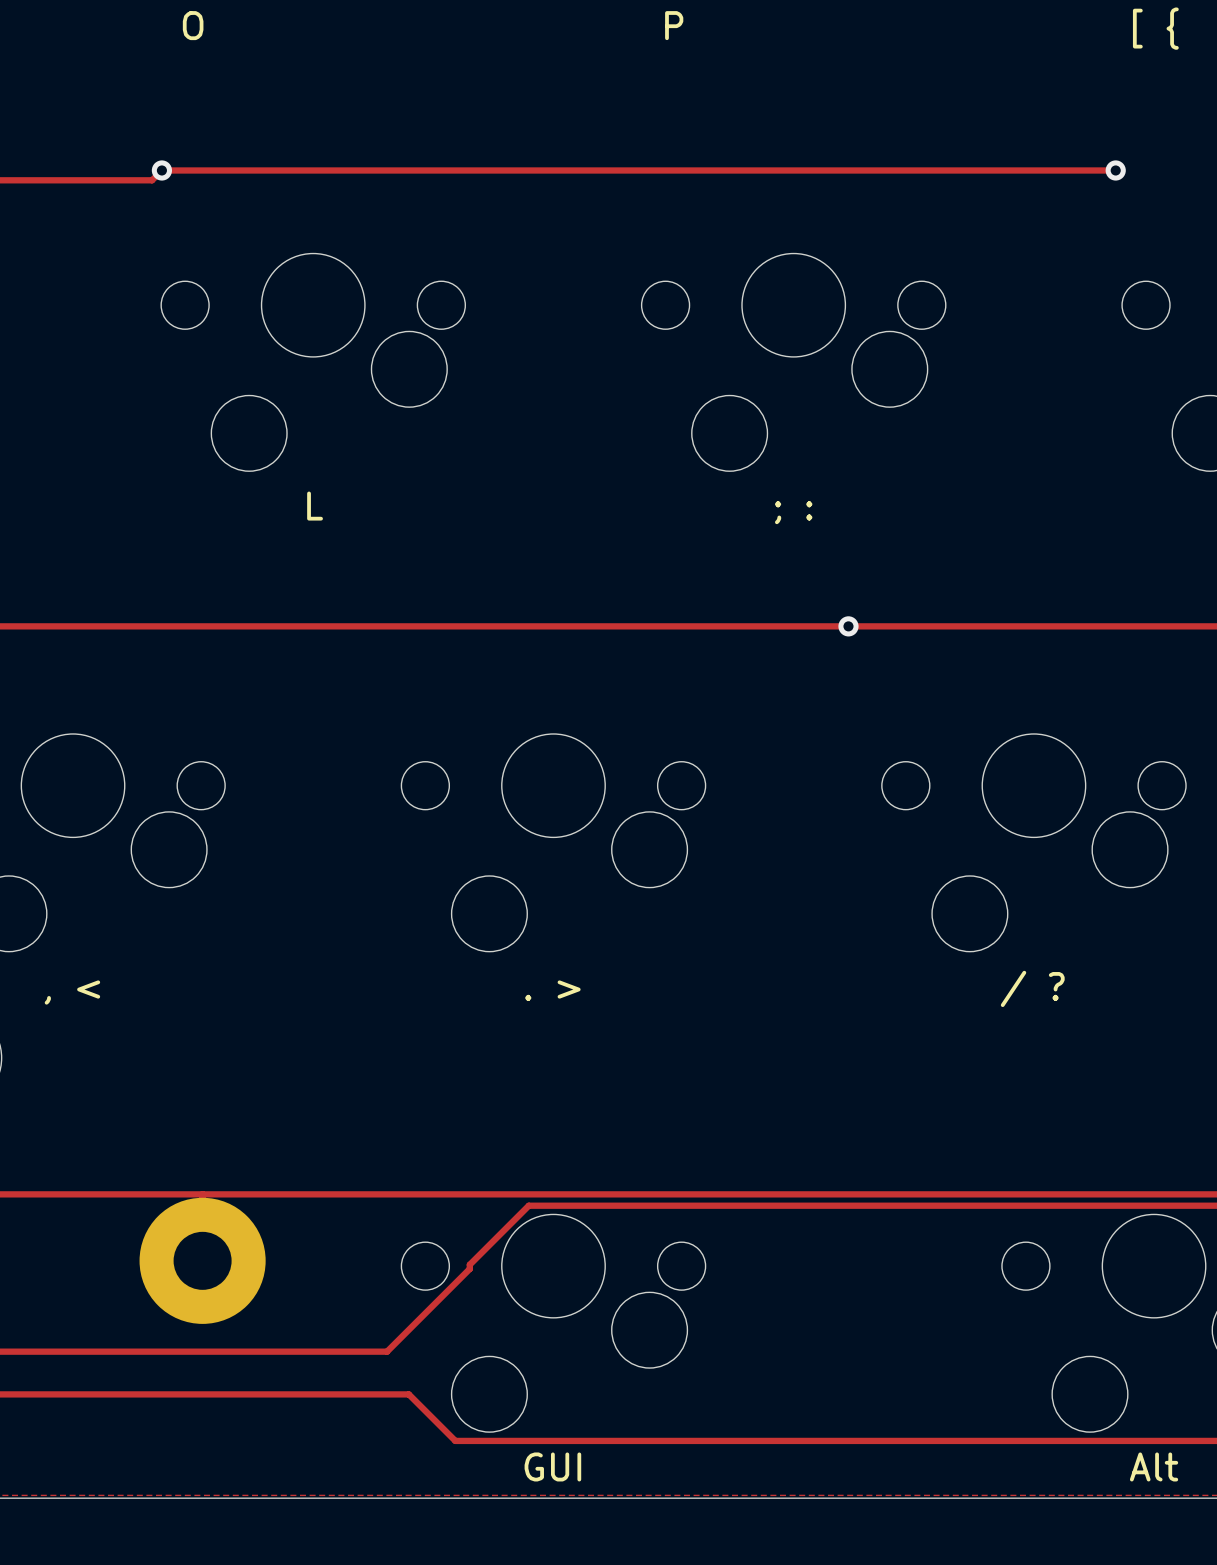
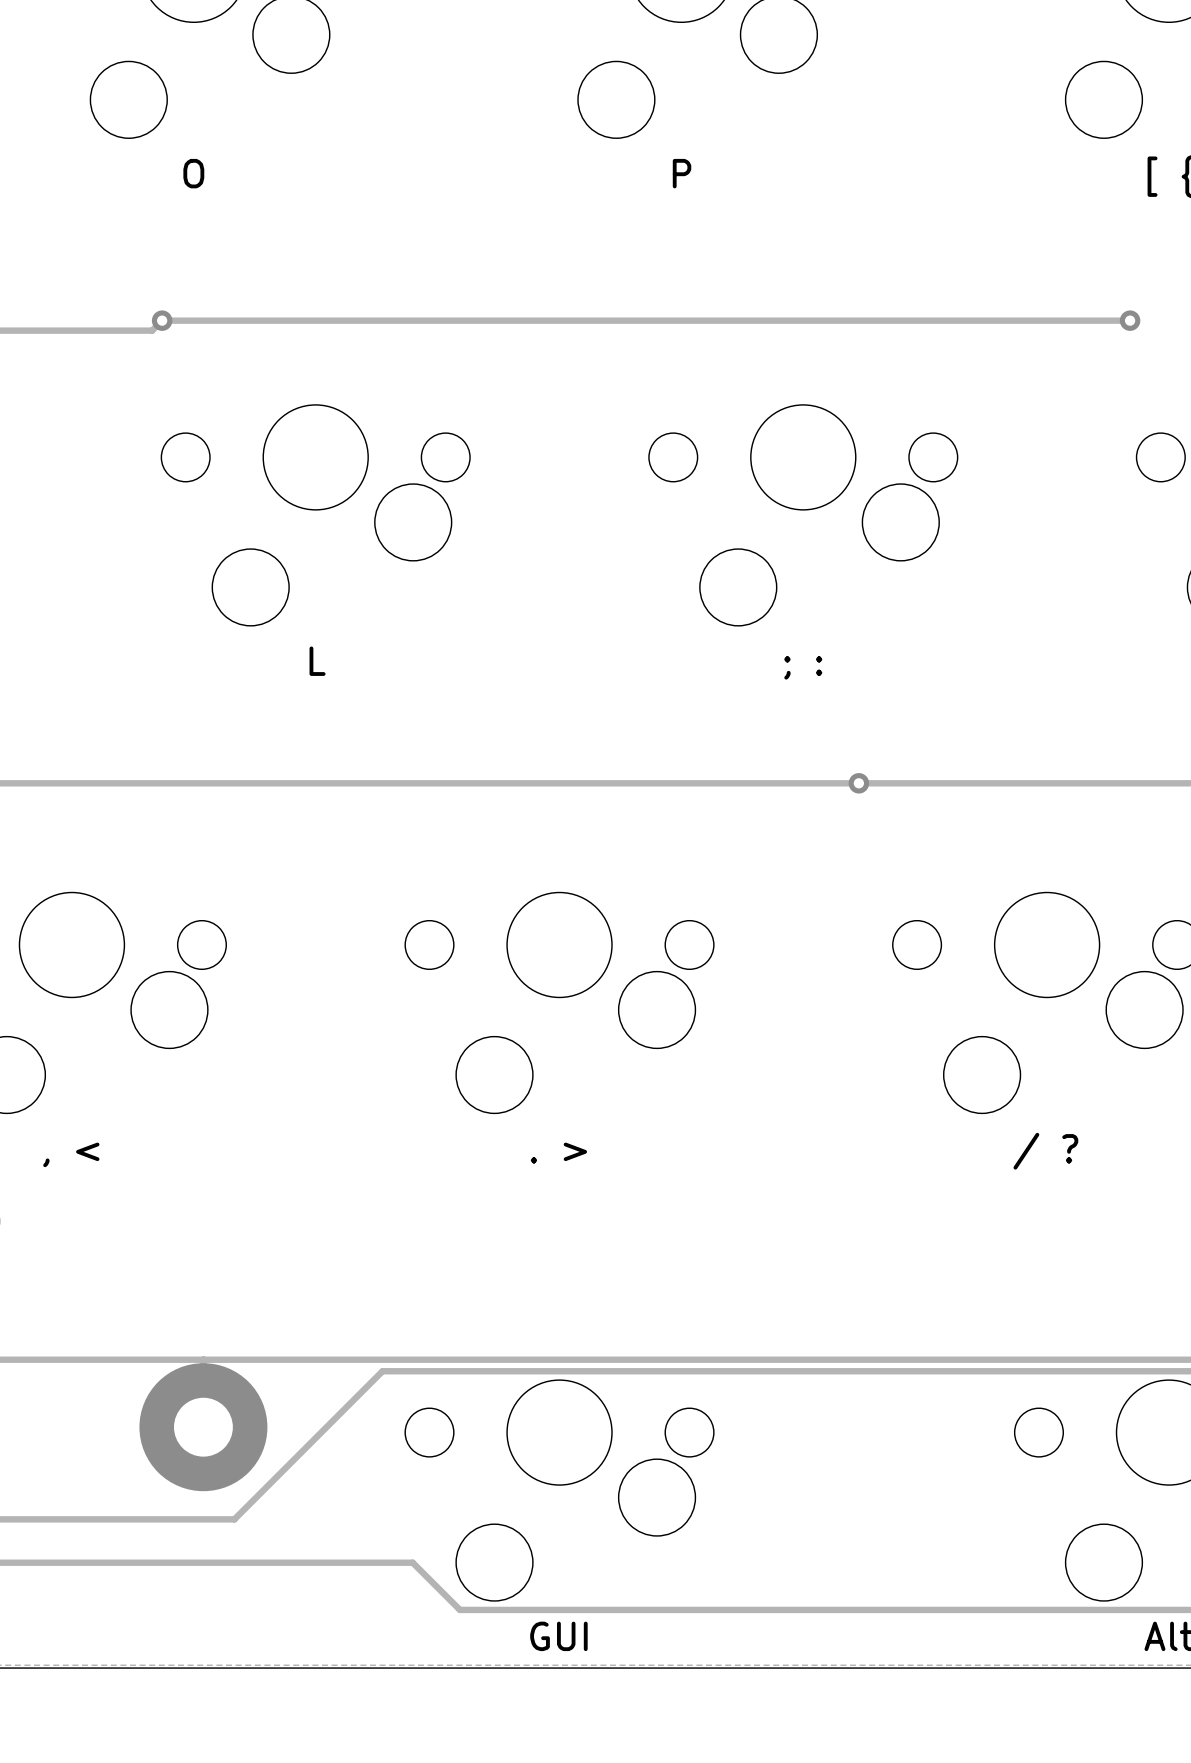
track: (528, 1205) (469, 1264) (469, 1268) (387, 1351) (233, 1351) -> (534, 1371) (382, 1371) (234, 1519)

